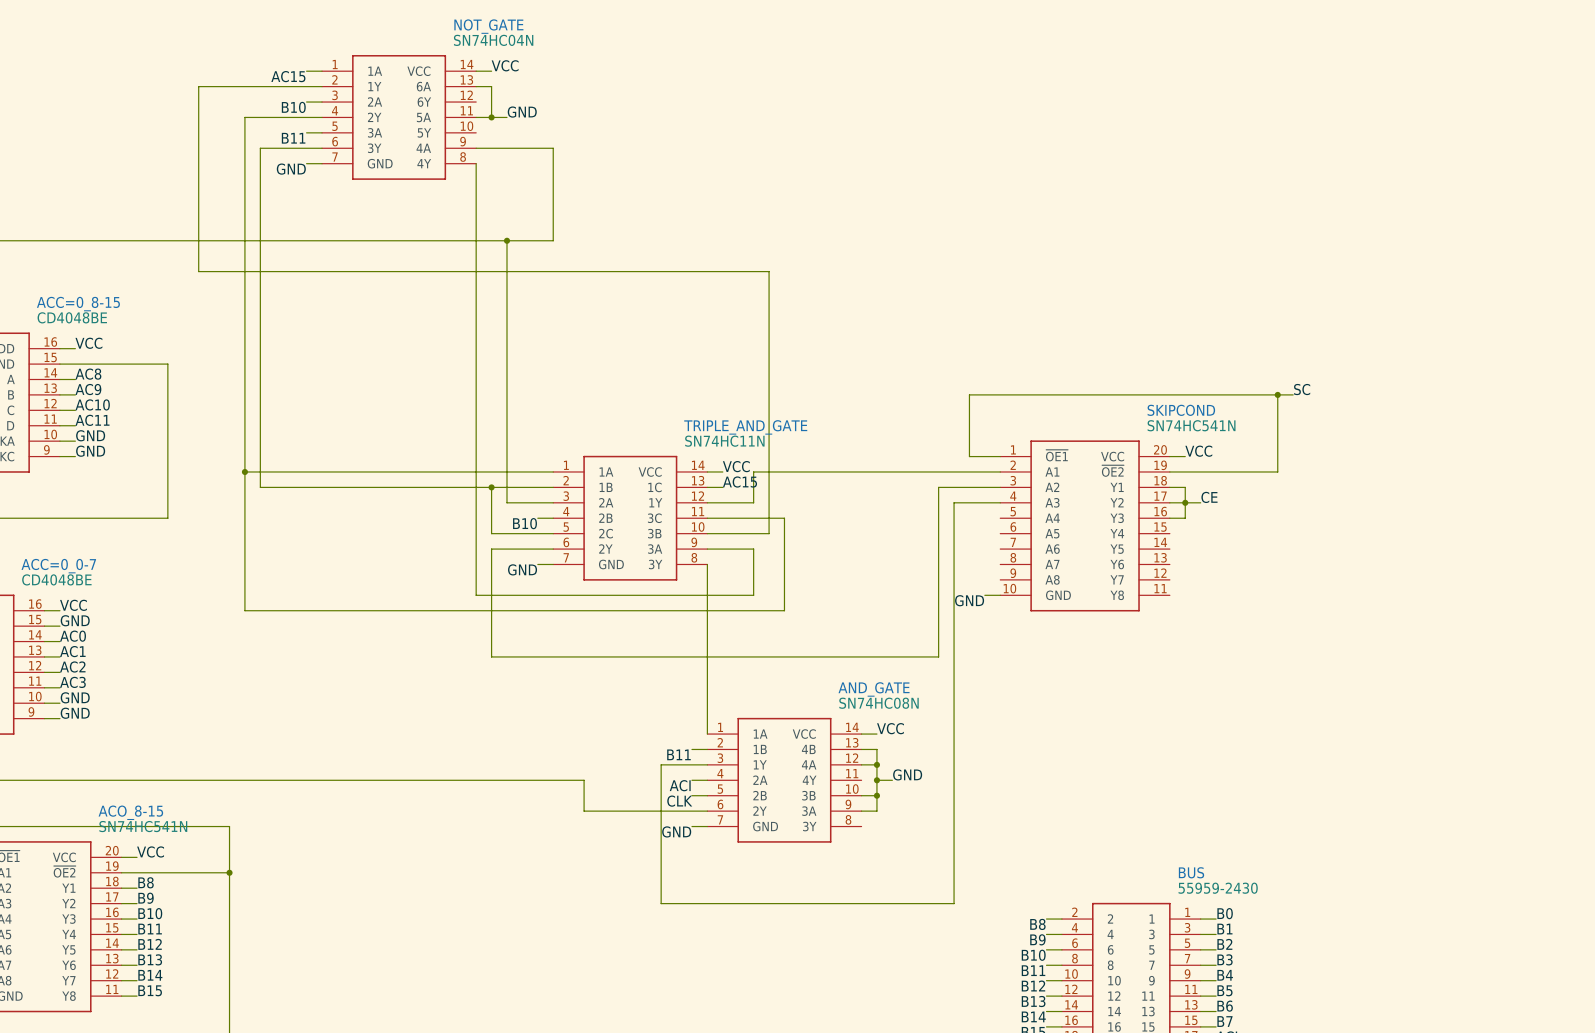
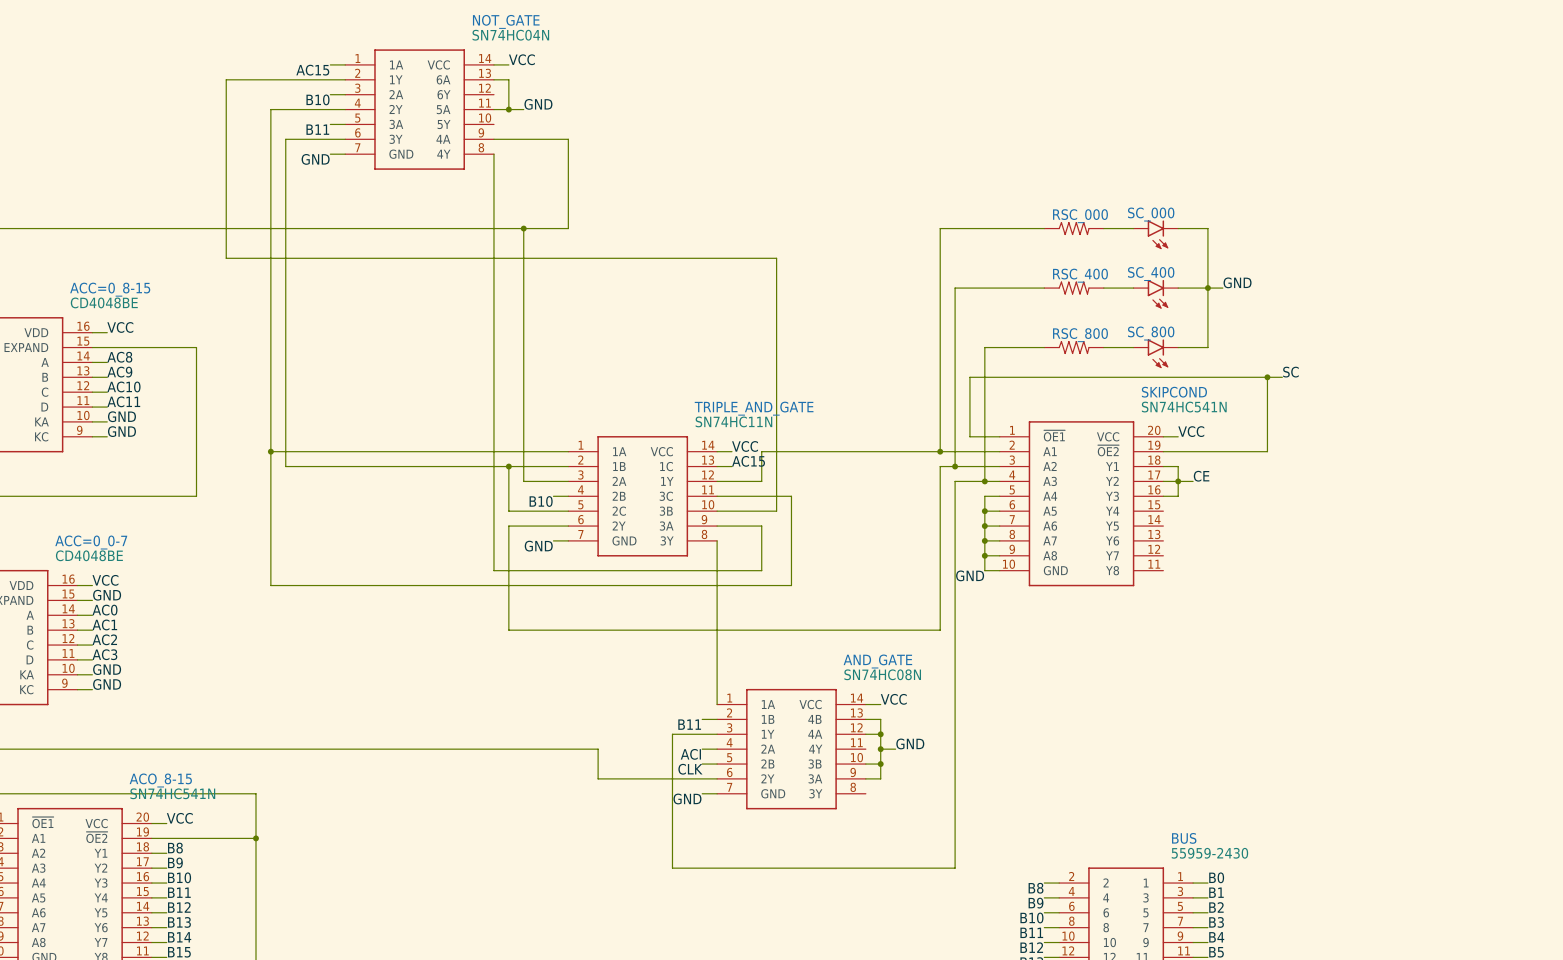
wire: none -> (1044, 228) (940, 228) (940, 451)
RSC_000: none -> (1074, 228)
wire: none -> (1103, 228) (1133, 228)
wire: none -> (1178, 228) (1207, 228) (1207, 347) (1178, 347)
SC_000: none -> (1155, 234)
label: none -> GND (1237, 282)
wire: none -> (1044, 288) (955, 288) (955, 466)
RSC_400: none -> (1074, 288)
wire: none -> (1103, 288) (1133, 288)
wire: none -> (1178, 288) (1222, 288)
junction: none -> (1207, 288)
SC_400: none -> (1155, 294)
wire: none -> (1044, 347) (984, 347) (984, 481)
RSC_800: none -> (1074, 347)
wire: none -> (1103, 347) (1133, 347)
SC_800: none -> (1155, 353)
junction: none -> (940, 451)
junction: none -> (955, 466)
junction: none -> (984, 481)
wire: none -> (999, 496) (984, 496) (984, 570)
wire: none -> (984, 511) (999, 511)
junction: none -> (984, 511)
wire: none -> (984, 526) (999, 526)
junction: none -> (984, 526)
wire: none -> (984, 540) (999, 540)
junction: none -> (984, 540)
wire: none -> (984, 555) (999, 555)
junction: none -> (984, 555)

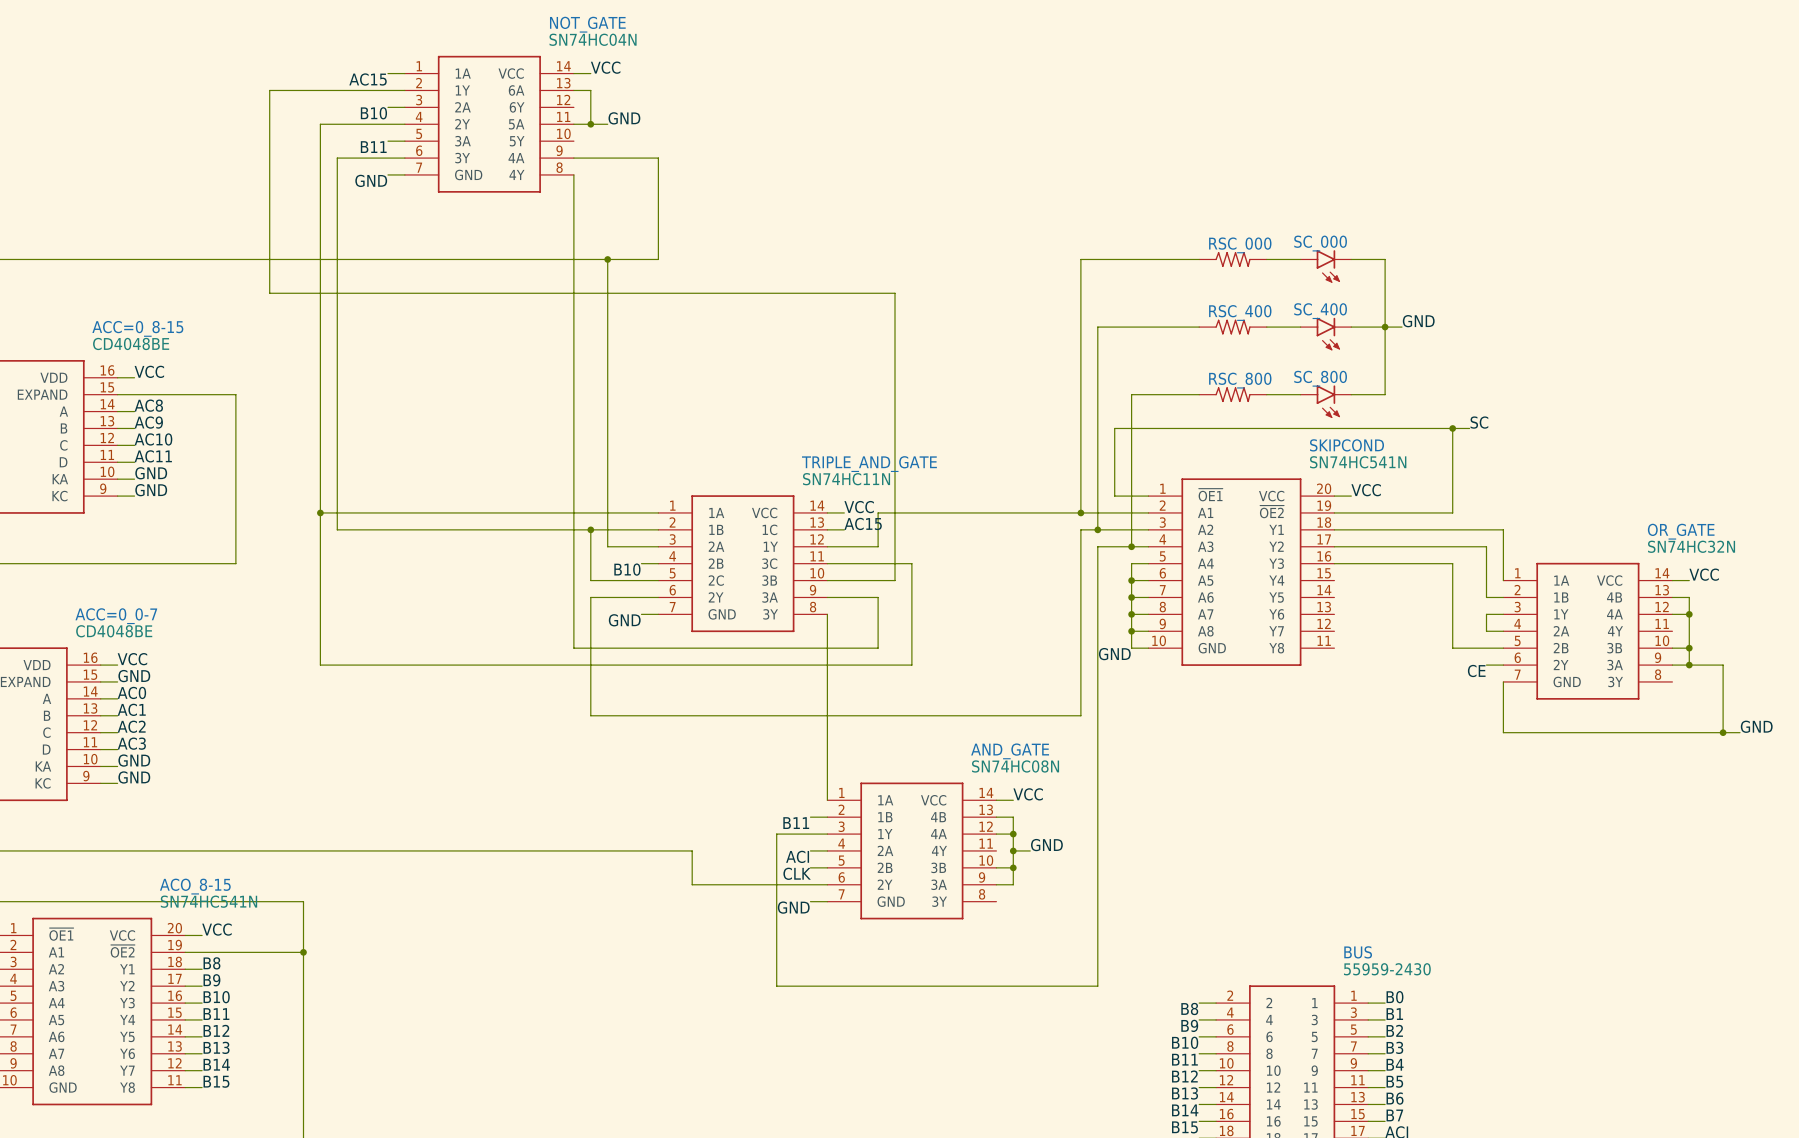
wire: (1178, 466) (1178, 496) -> (1351, 529) (1503, 529) (1503, 580)
label position: CE (1201, 476) -> CE (1476, 670)
junction: (1178, 481) -> none
wire: none -> (1368, 546) (1486, 546) (1486, 597) (1503, 597)
wire: none -> (1351, 563) (1452, 563) (1452, 648) (1503, 648)
label: none -> VCC (1704, 574)
wire: none -> (1672, 580) (1689, 580)
wire: none -> (1672, 597) (1689, 597) (1689, 665)
wire: none -> (1503, 614) (1486, 614) (1486, 631) (1503, 631)
wire: none -> (1672, 614) (1689, 614)
junction: none -> (1689, 614)
OR_GATE: none -> SN74HC32N (1587, 631)
wire: none -> (1672, 648) (1689, 648)
junction: none -> (1689, 648)
wire: none -> (1486, 665) (1503, 665)
wire: none -> (1672, 665) (1723, 665) (1723, 732)
junction: none -> (1689, 665)
wire: none -> (1503, 681) (1503, 732) (1740, 732)
label: none -> GND (1756, 726)
junction: none -> (1723, 732)

